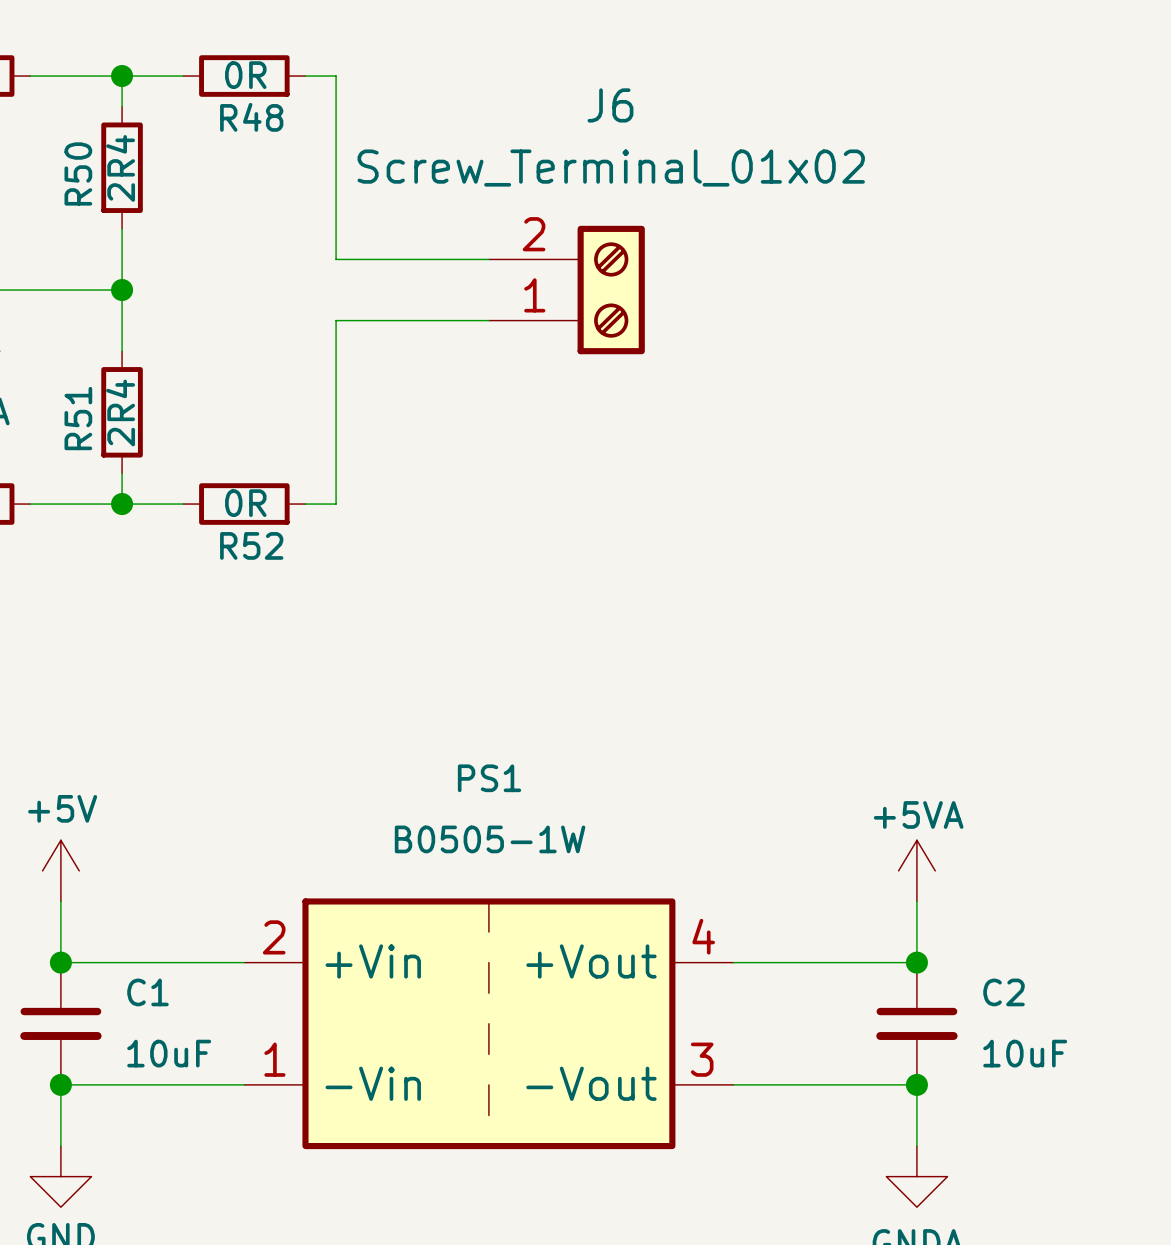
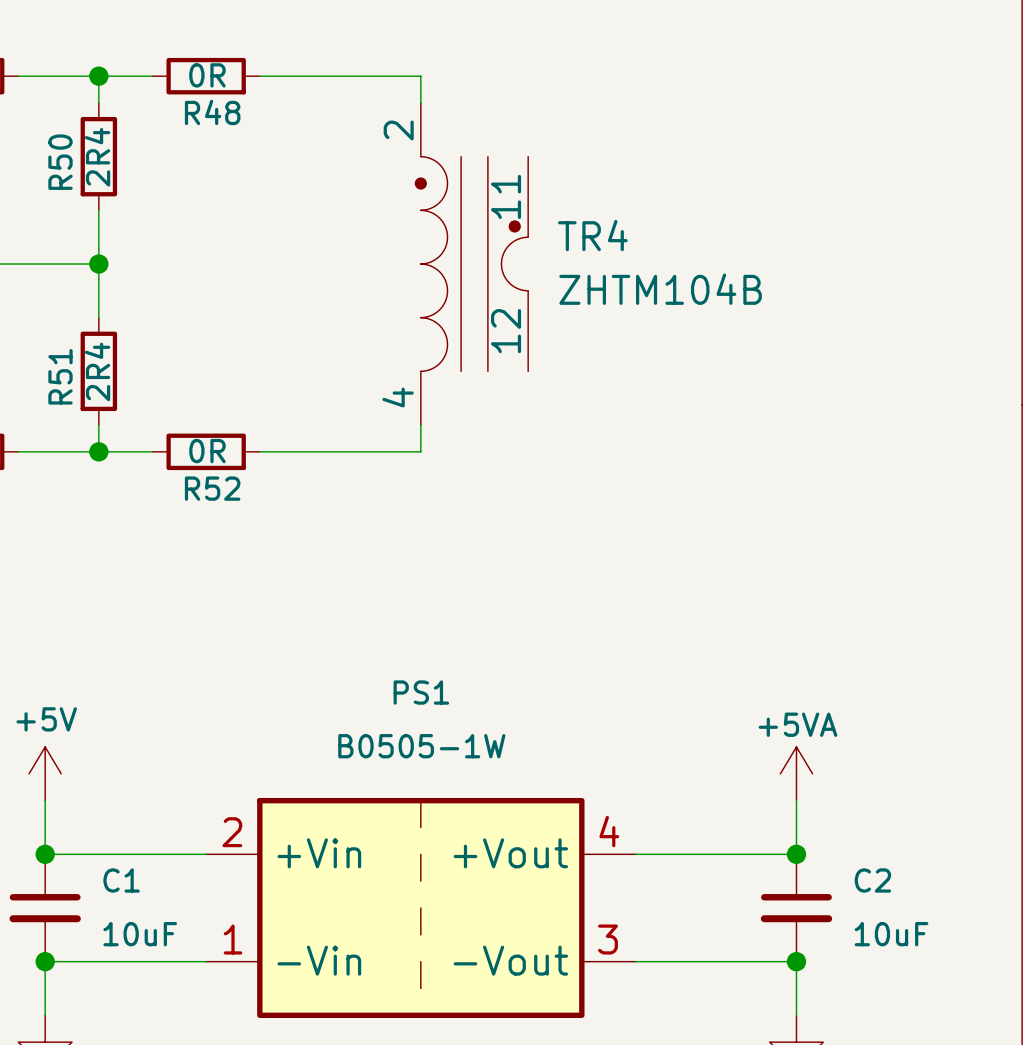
wire: (336, 76) (336, 259) (488, 259) -> (286, 76) (420, 76) (420, 103)
TR4: none -> ZHTM104B (471, 264)
J6: Screw_Terminal_01x02 (566, 290) -> none
wire: (488, 320) (336, 320) (336, 504) -> (420, 425) (420, 451) (286, 451)

